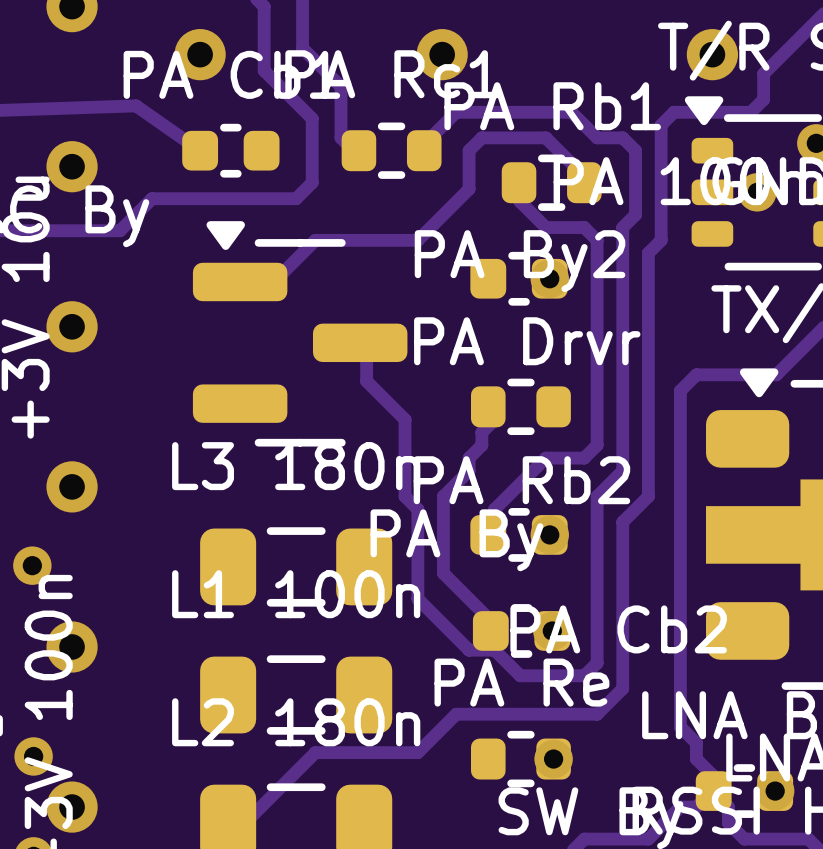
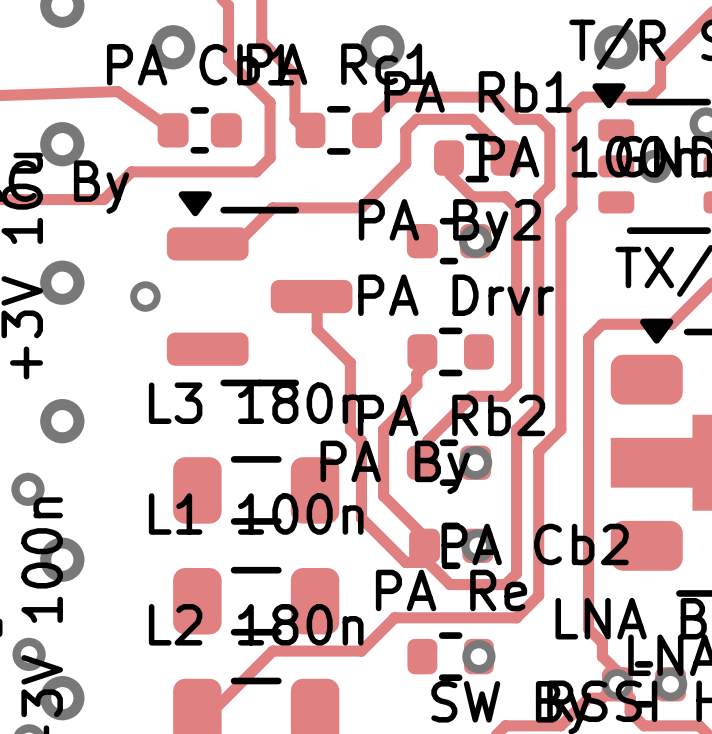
via: none -> (145, 296)
via: none -> (617, 684)

